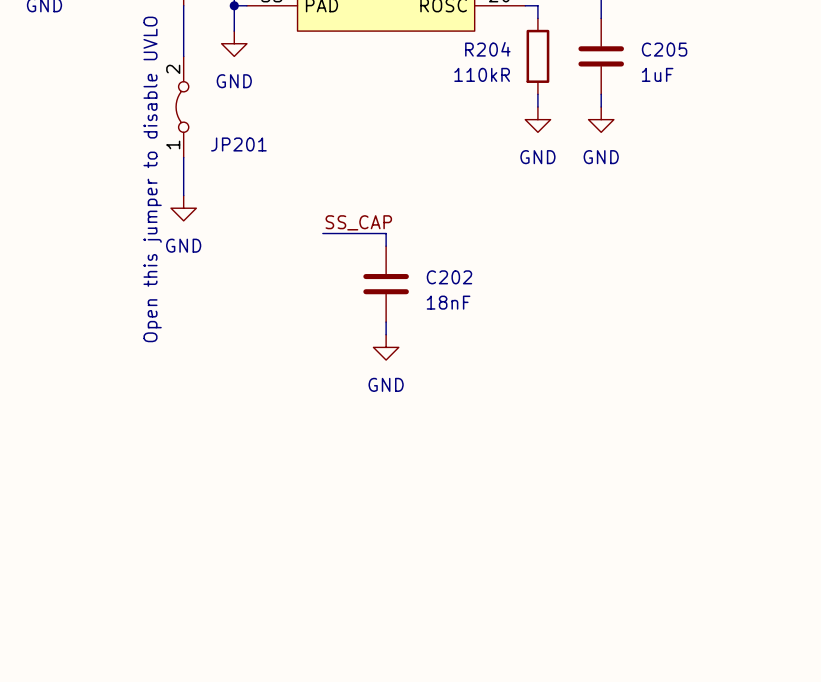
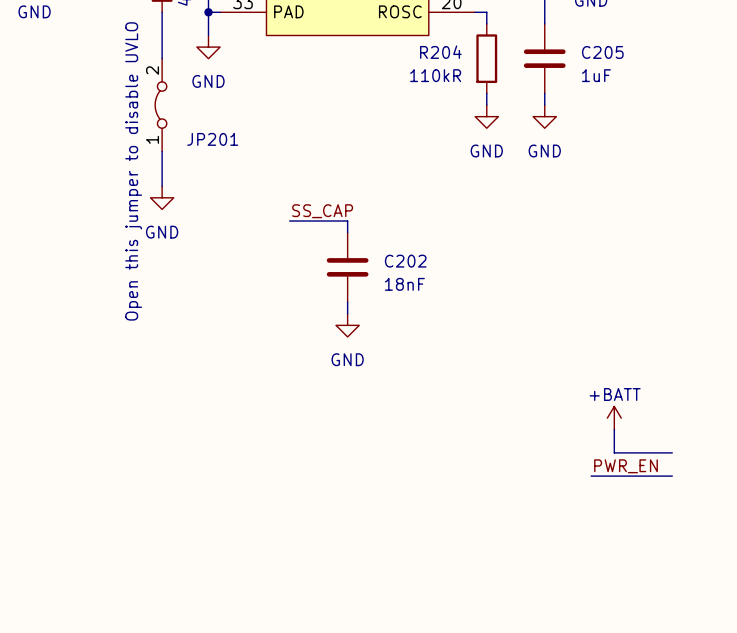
power symbol: none -> +BATT (614, 418)
wire: none -> (614, 429) (614, 452) (672, 452)
label: none -> PWR_EN (626, 466)
wire: none -> (591, 476) (672, 476)

